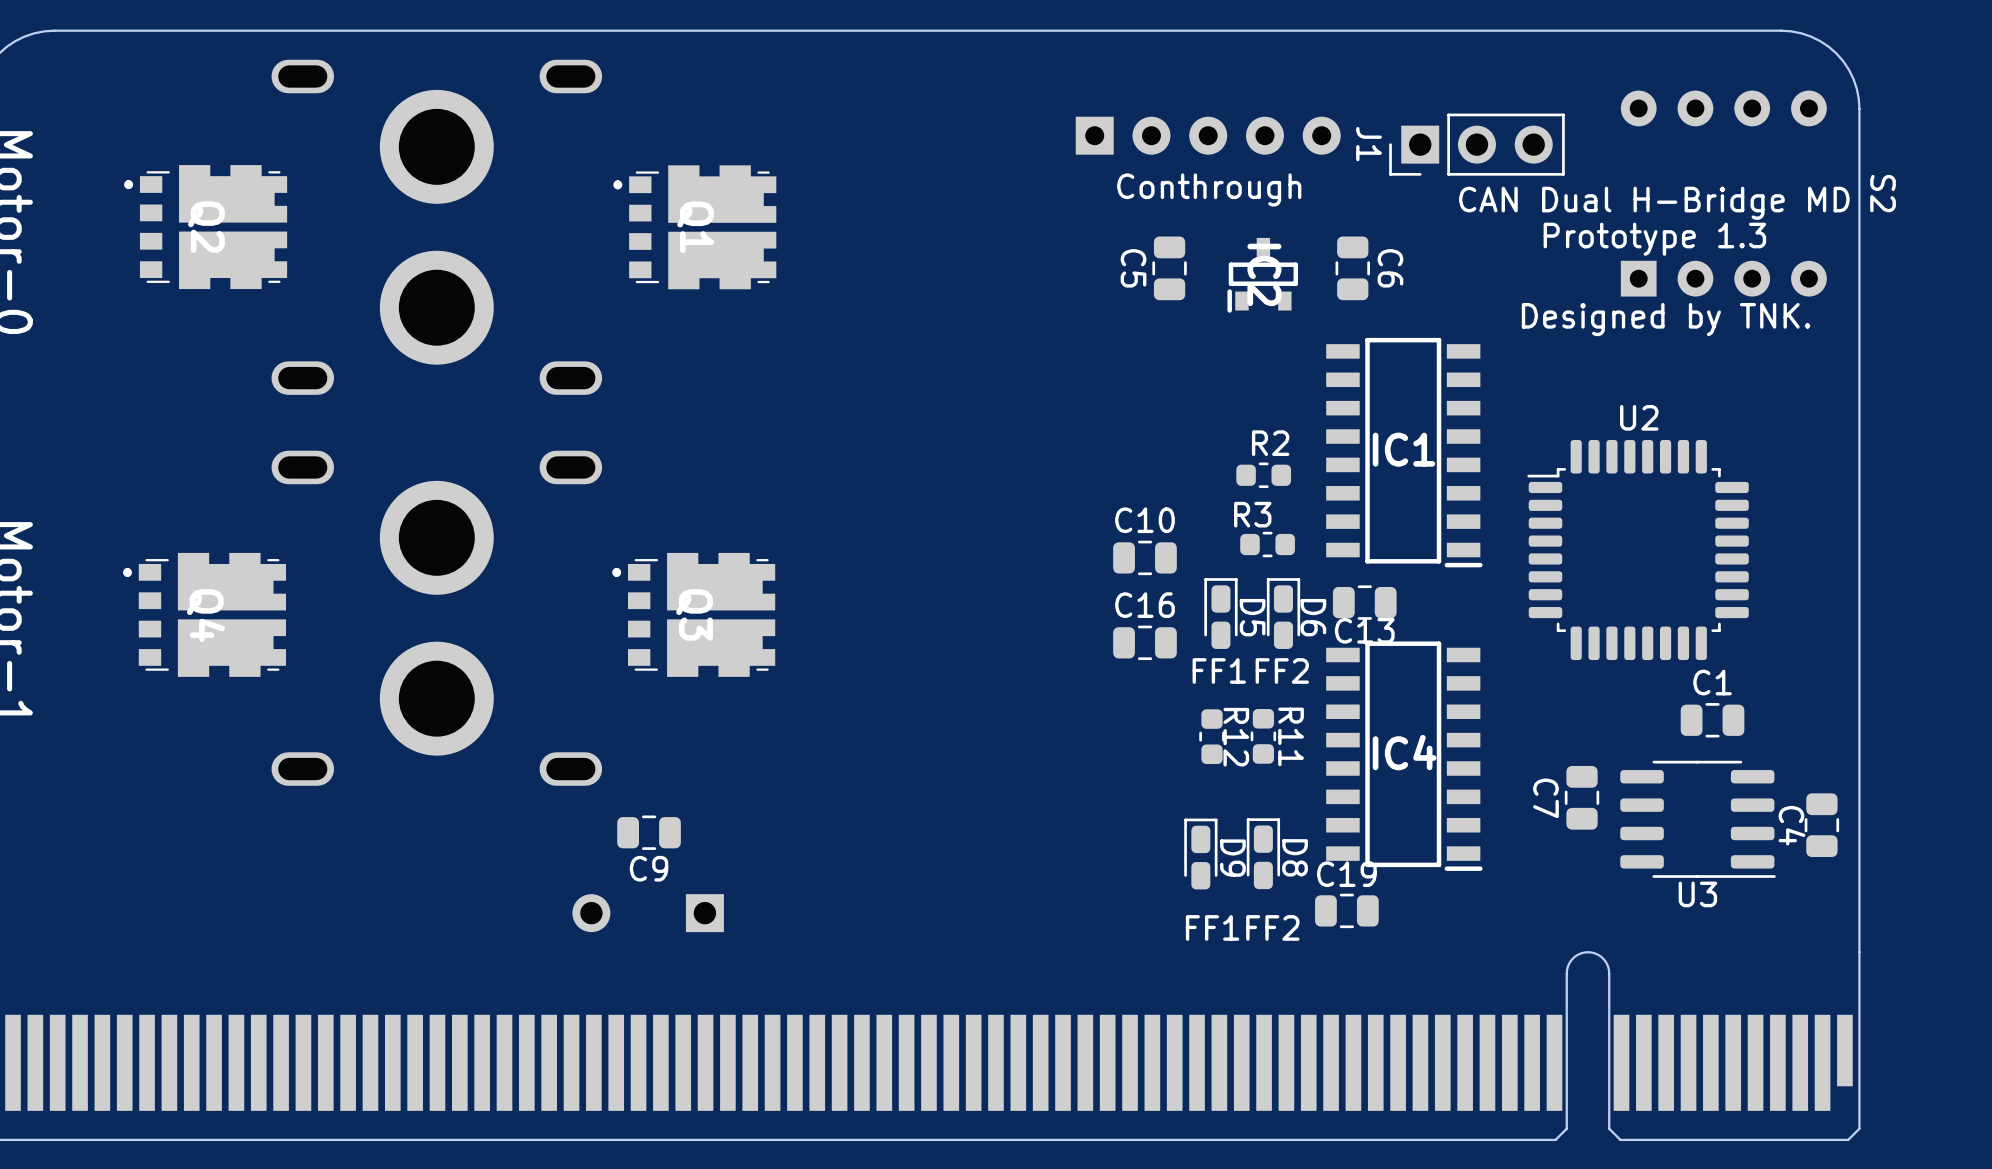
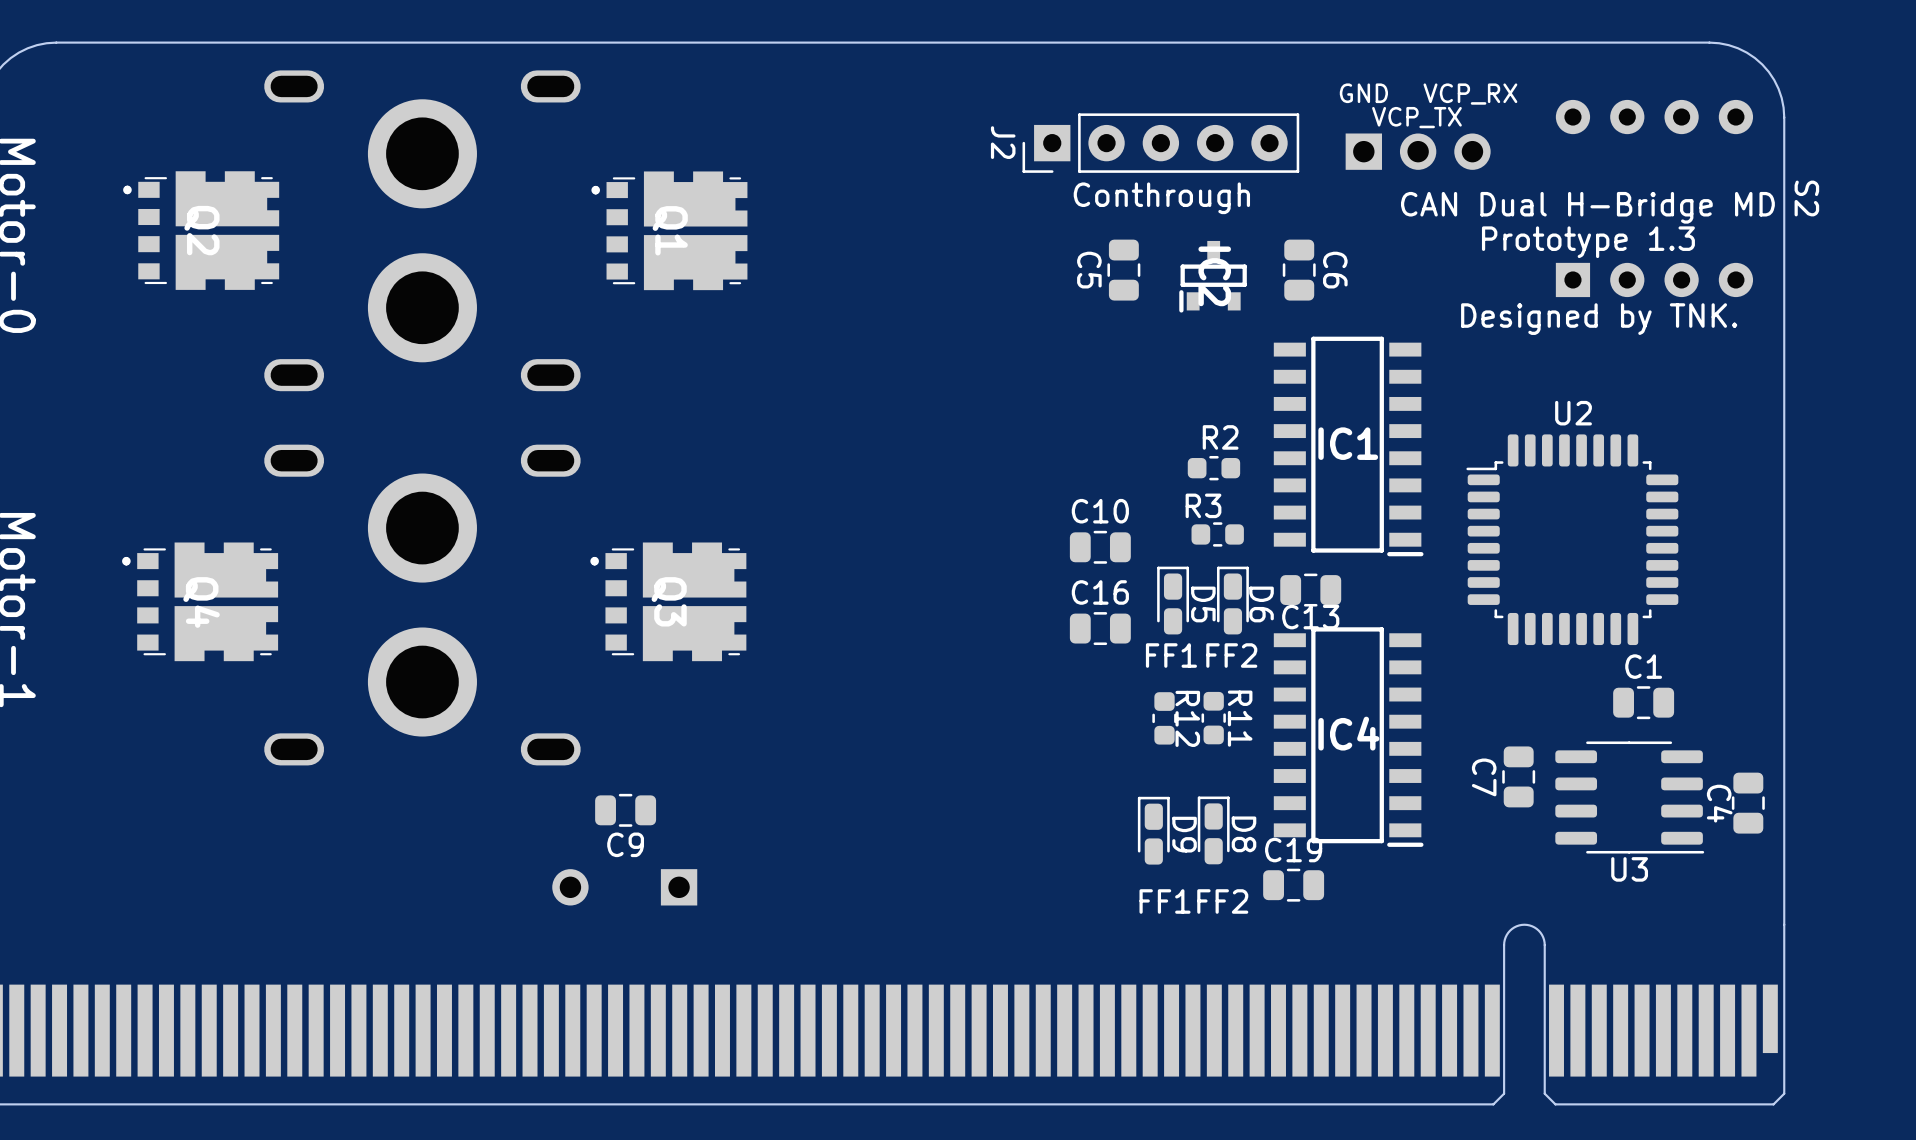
text: none -> GND (1363, 93)
text: none -> VCP_RX (1470, 94)
text: none -> VCP_TX (1416, 117)
J2 side: top (1208, 135) -> bottom (1160, 143)
J1 side: bottom (1476, 144) -> top (1418, 151)
text: none -> Conthrough (1161, 198)

